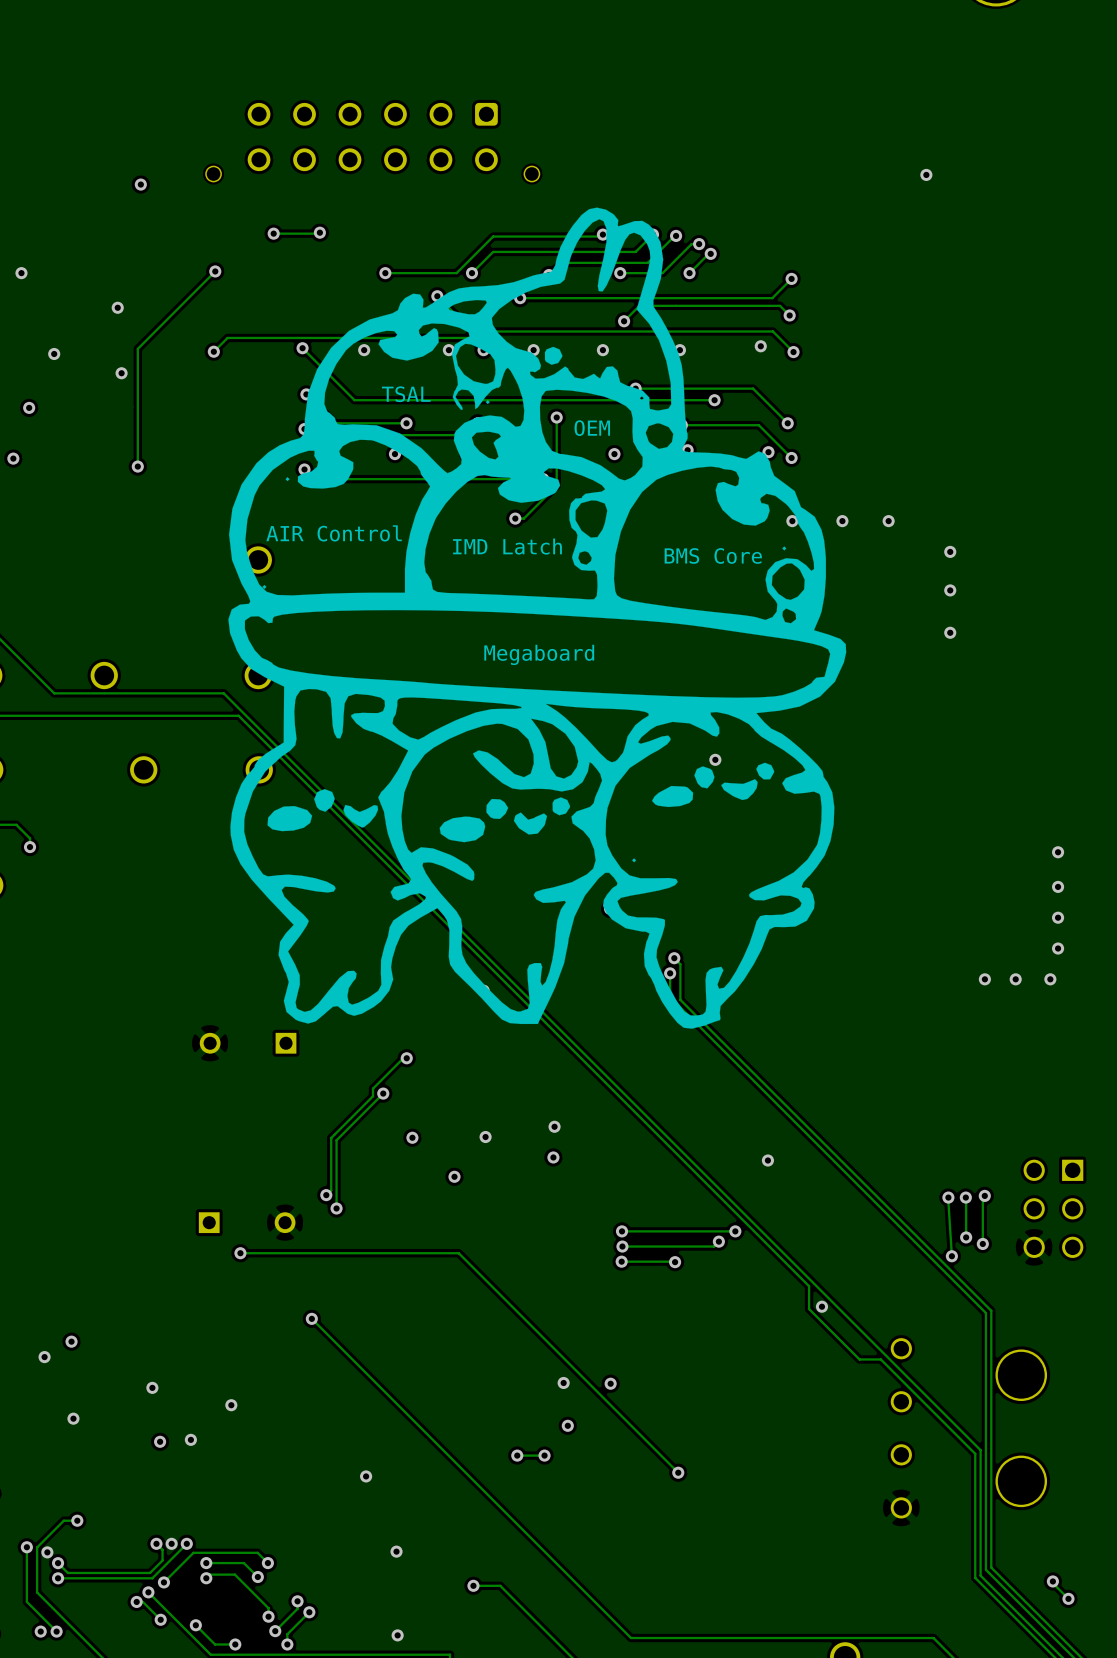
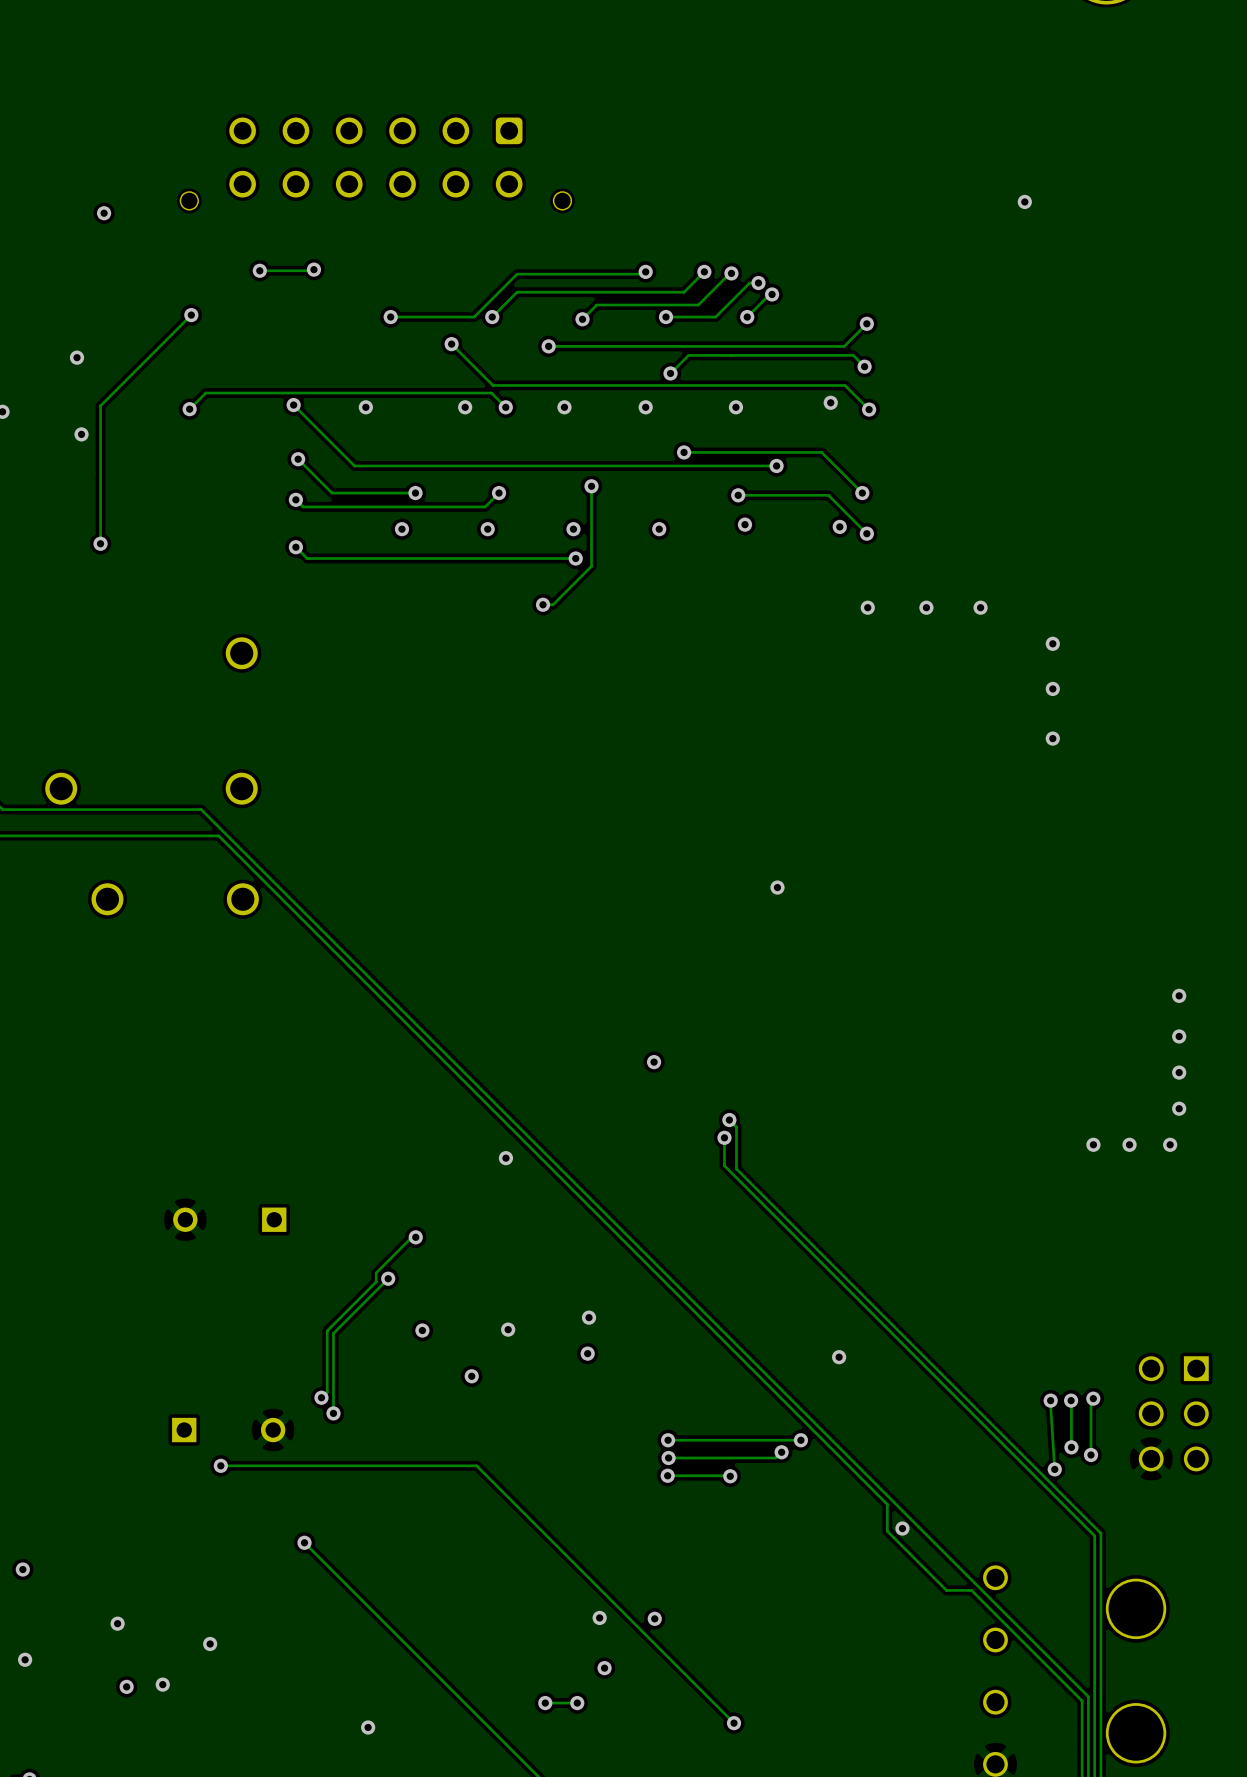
drawing: [228, 207, 847, 1029] -> none
text: TSAL (406, 394) -> none
text: OEM (592, 428) -> none
text: AIR Control (334, 533) -> none
text: IMD Latch (507, 546) -> none
text: BMS Core (713, 555) -> none
text: Megaboard (539, 654) -> none

